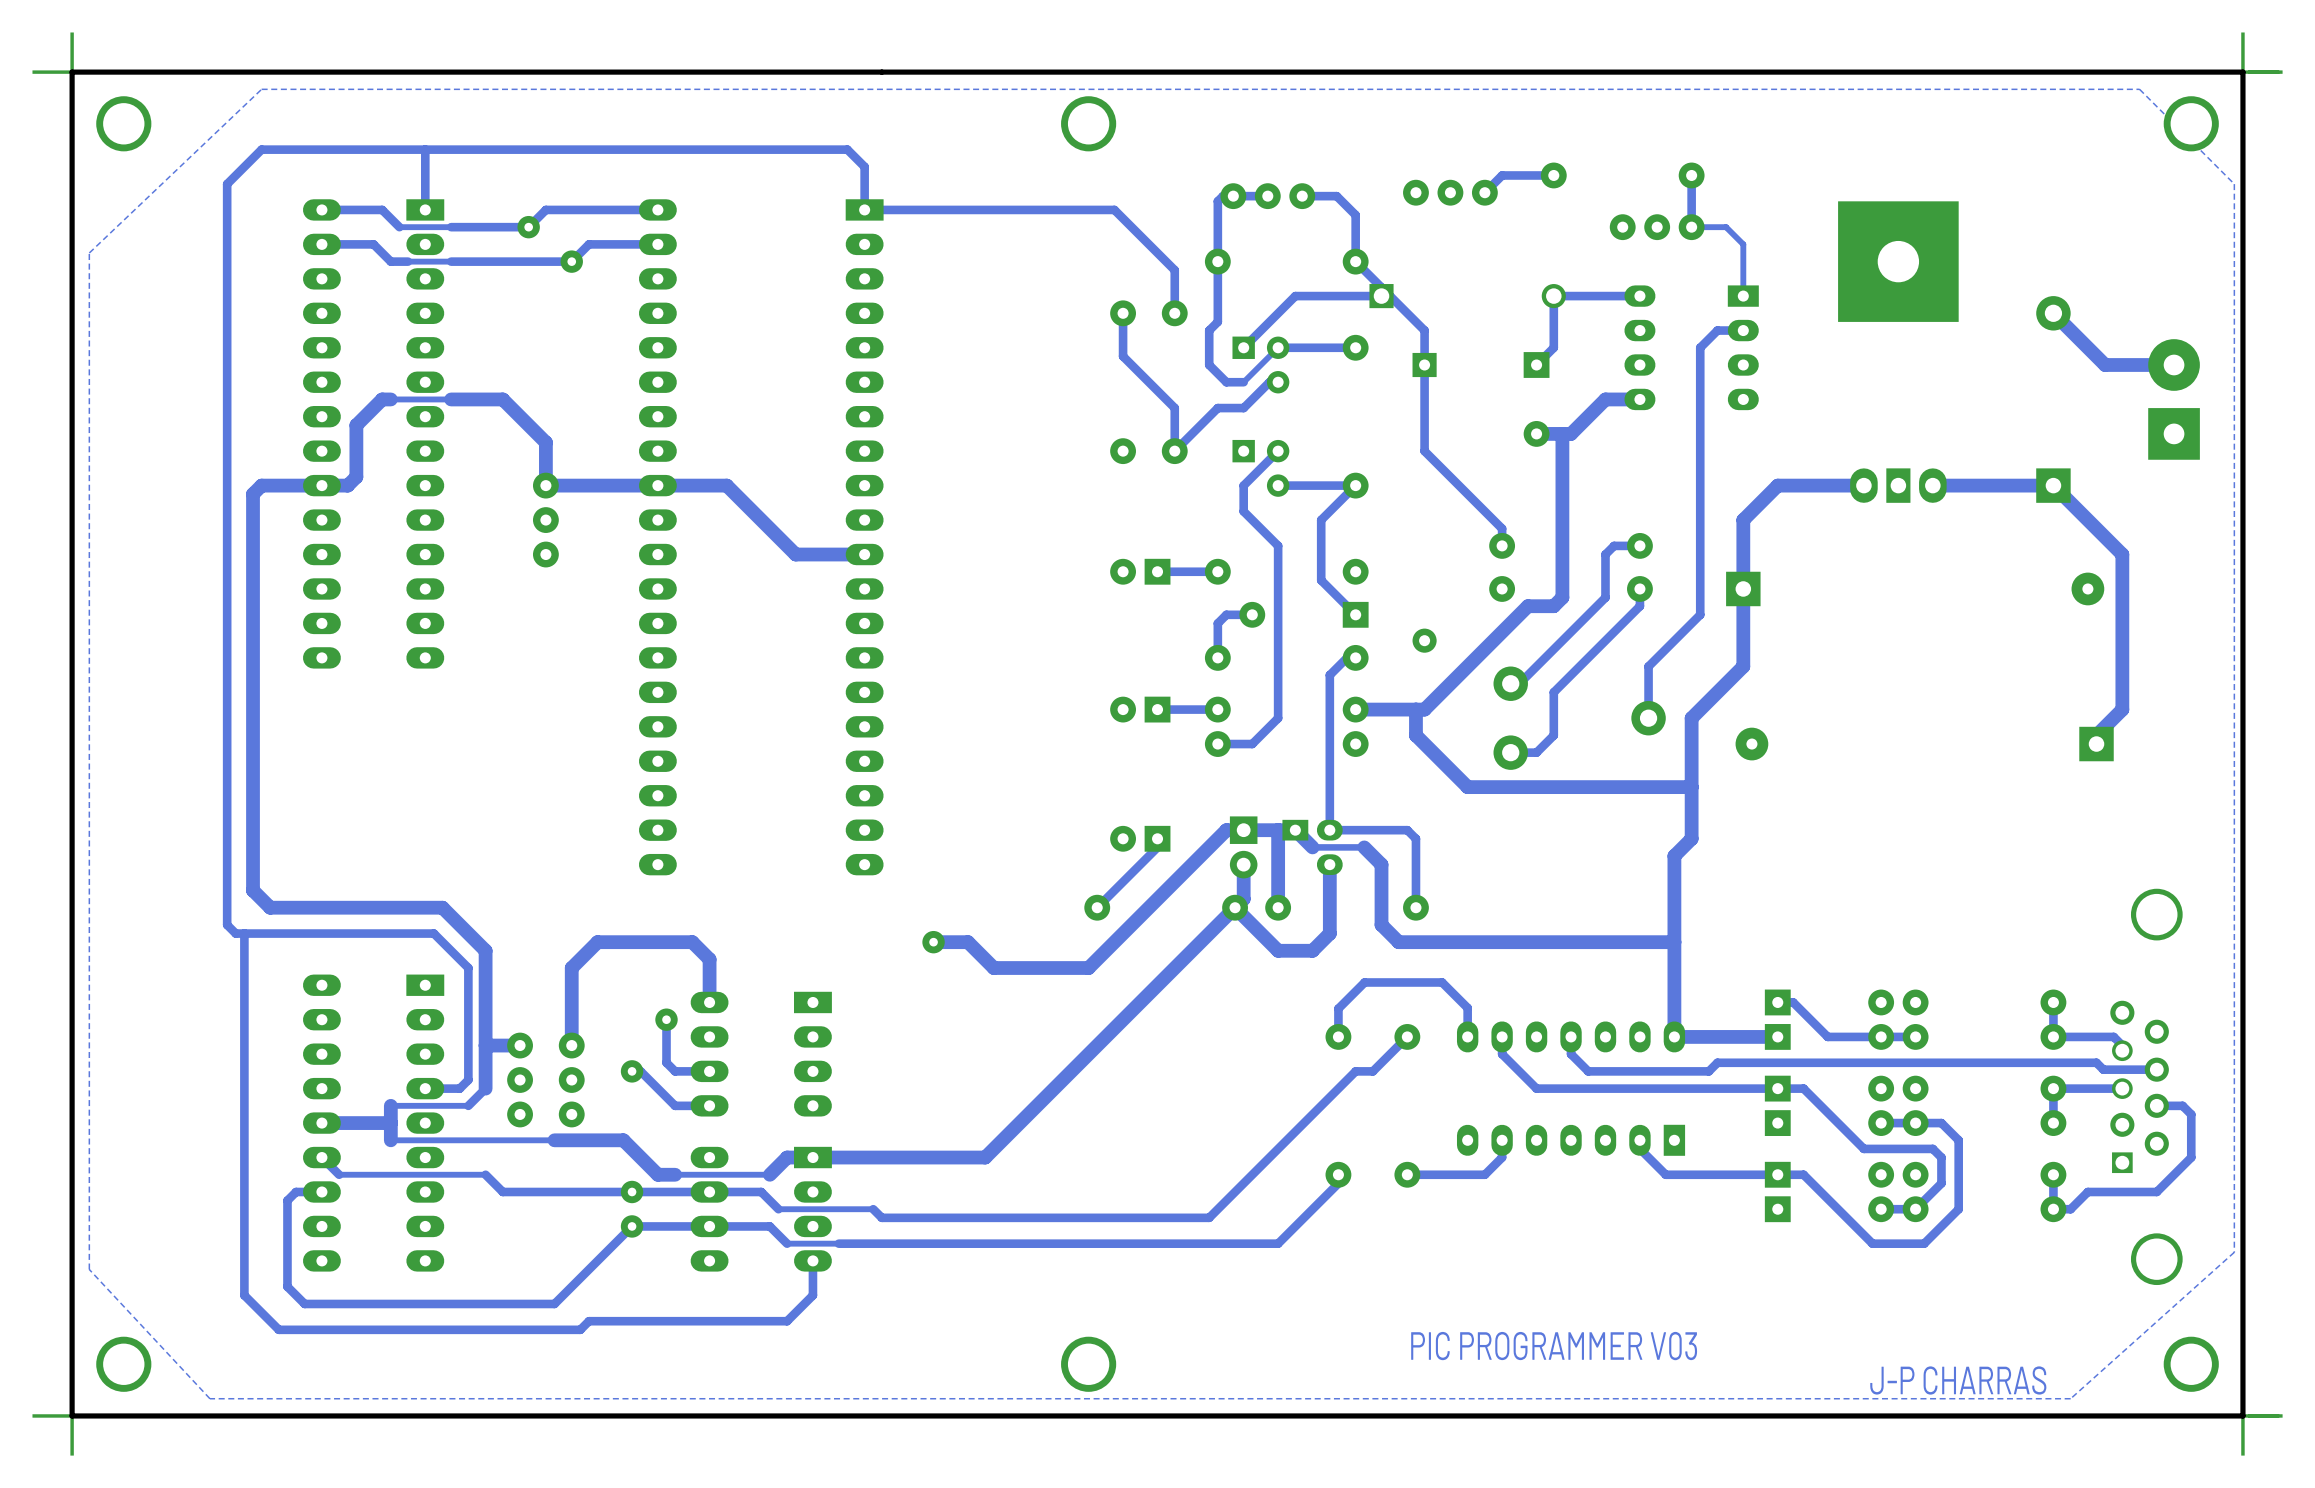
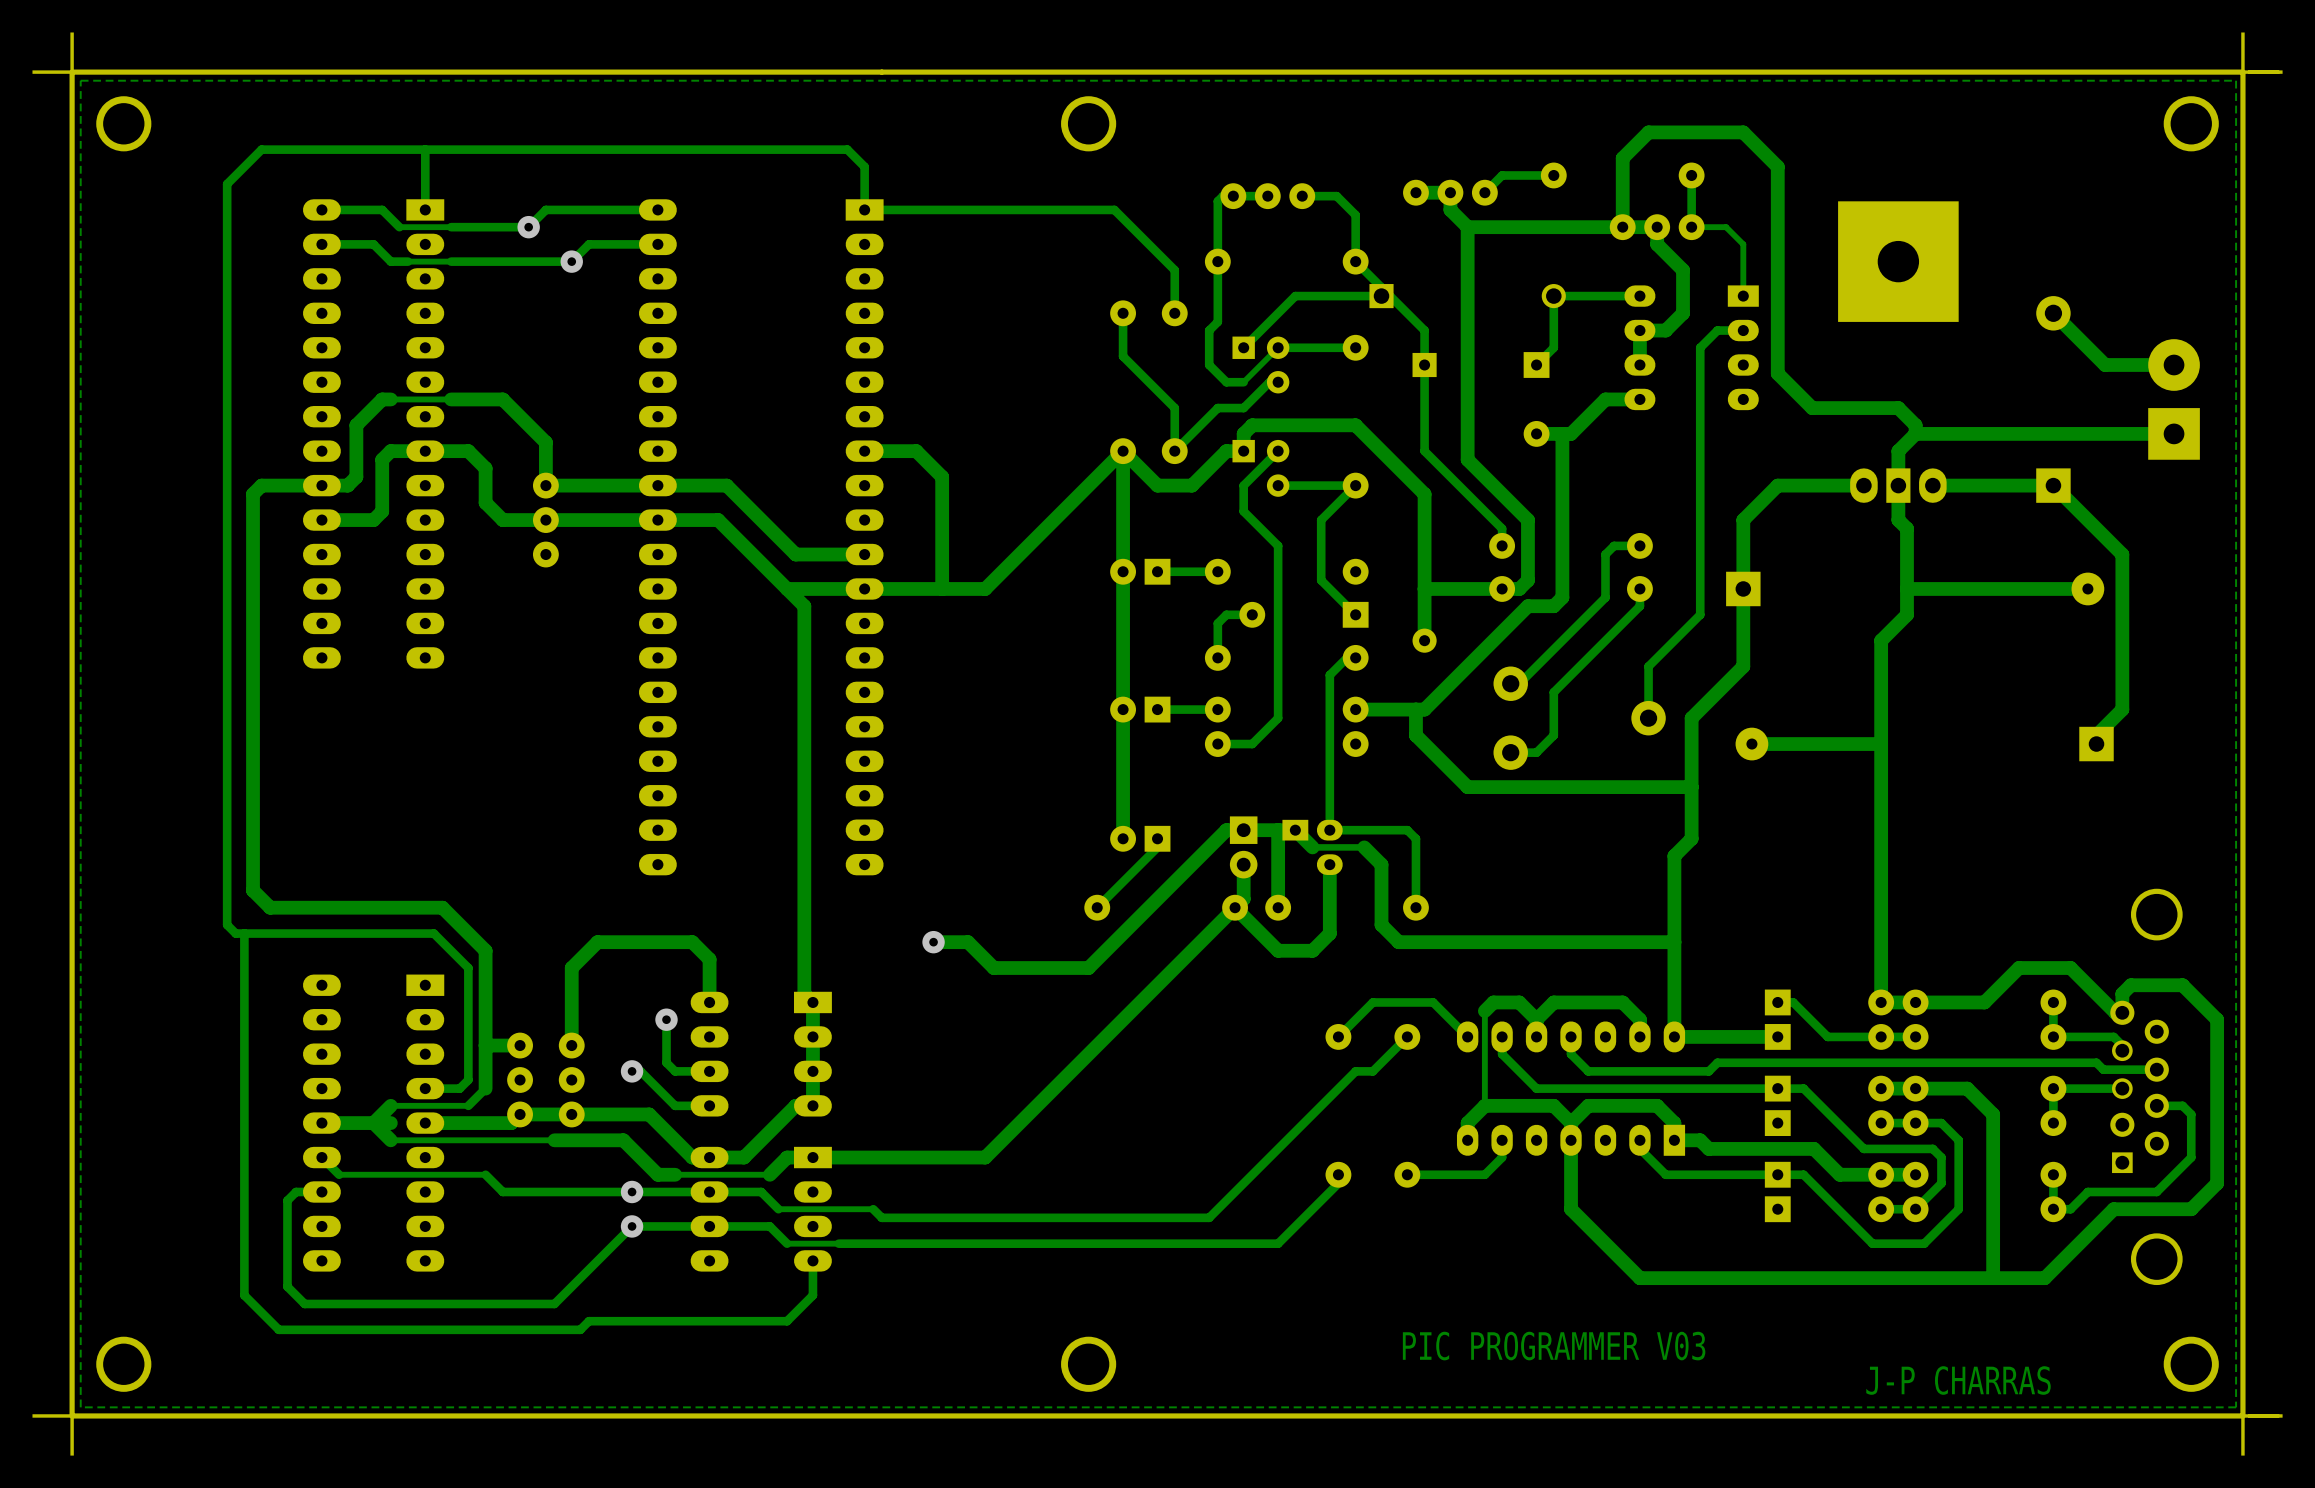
zone outline: (2139, 89) (261, 89) (89, 253) (89, 1269) (209, 1398) (2070, 1398) (2234, 1252) (2234, 184) (2139, 89) -> (2236, 80) (2236, 1407) (80, 1407) (80, 80) (2236, 80)
track: none -> (1415, 192) (1450, 192) (1450, 209) (1467, 227)
track: none -> (1467, 227) (1467, 459) (1527, 520) (1527, 580) (1519, 588) (1424, 588)
track: none -> (1467, 227) (1657, 227) (1657, 244) (1683, 270) (1683, 313) (1665, 330) (1639, 330) (1639, 365)
track: none -> (1622, 227) (1622, 158) (1648, 132) (1743, 132) (1777, 166) (1777, 373) (1812, 408) (1898, 408) (1915, 425) (1915, 433)
track: none -> (1915, 433) (1898, 451) (1898, 520) (1906, 528) (1906, 614) (1881, 640) (1881, 1002) (1984, 1002) (2018, 968) (2070, 968) (2115, 1012) (2122, 1012) (2122, 993) (2130, 985) (2182, 985) (2217, 1019) (2217, 1183) (2191, 1209) (2113, 1209) (2044, 1278) (1639, 1278) (1571, 1209) (1571, 1123)
track: none -> (2174, 433) (1915, 433)
track: none -> (864, 451) (916, 451) (942, 476) (942, 588)
track: none -> (1123, 451) (1123, 838)
track: none -> (1123, 451) (1157, 485) (1191, 485) (1226, 451) (1243, 451) (1243, 433) (1252, 425) (1355, 425) (1424, 494) (1424, 640)
track: none -> (1123, 451) (985, 588) (787, 588)
track: none -> (321, 520) (373, 520) (382, 511) (382, 459) (390, 451) (468, 451) (485, 468) (485, 502) (502, 520) (718, 520) (804, 606) (804, 993) (812, 1002) (812, 1105) (795, 1105) (744, 1157) (692, 1157) (649, 1114) (520, 1114) (511, 1123) (425, 1123)
track: none -> (2087, 588) (1906, 588)
track: none -> (1881, 744) (1751, 744)
track: none -> (1536, 1019) (1519, 1002) (1493, 1002) (1484, 1011) (1484, 1105)
track: none -> (1536, 1019) (1553, 1002) (1622, 1002) (1639, 1019) (1639, 1036)
track: (1467, 1036) (1467, 1007) (1442, 982) (1364, 982) (1338, 1008) (1338, 1036) -> (1467, 1036) (1433, 1002) (1372, 1002) (1338, 1036)
track: none -> (1881, 1088) (1967, 1088) (1993, 1114) (1993, 1278)
track: (390, 1105) (390, 1140) -> (390, 1105) (373, 1123) (390, 1140)
track: none -> (1484, 1105) (1467, 1123) (1467, 1140)
track: none -> (1484, 1105) (1553, 1105) (1571, 1123)
track: none -> (1571, 1123) (1588, 1105) (1657, 1105) (1674, 1123) (1674, 1140) (1700, 1140) (1708, 1148) (1813, 1148) (1839, 1174) (1915, 1174)

